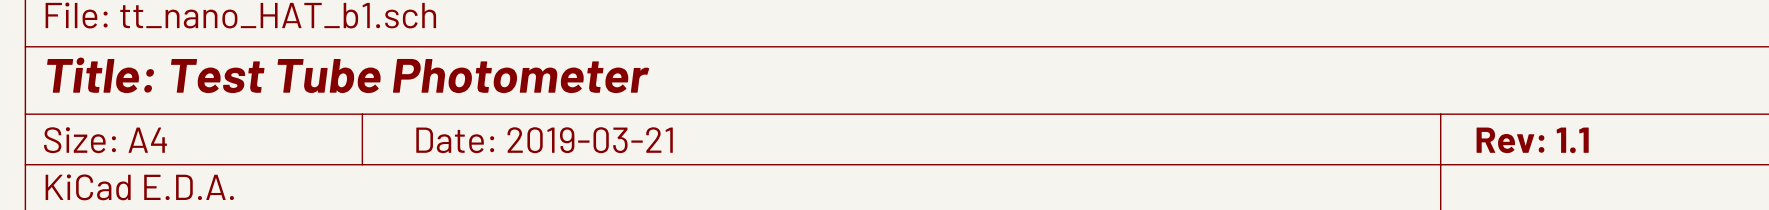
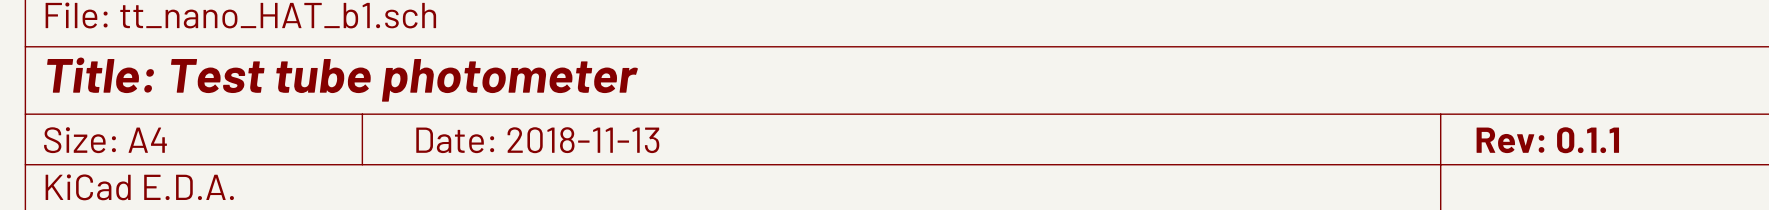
title block: Title: Test Tube Photometer (348, 75) -> Title: Test tube photometer (342, 79)
title block: Date: 2019-03-21 (544, 140) -> Date: 2018-11-13 (537, 140)
title block: Rev: 1.1 (1532, 140) -> Rev: 0.1.1 (1547, 140)

